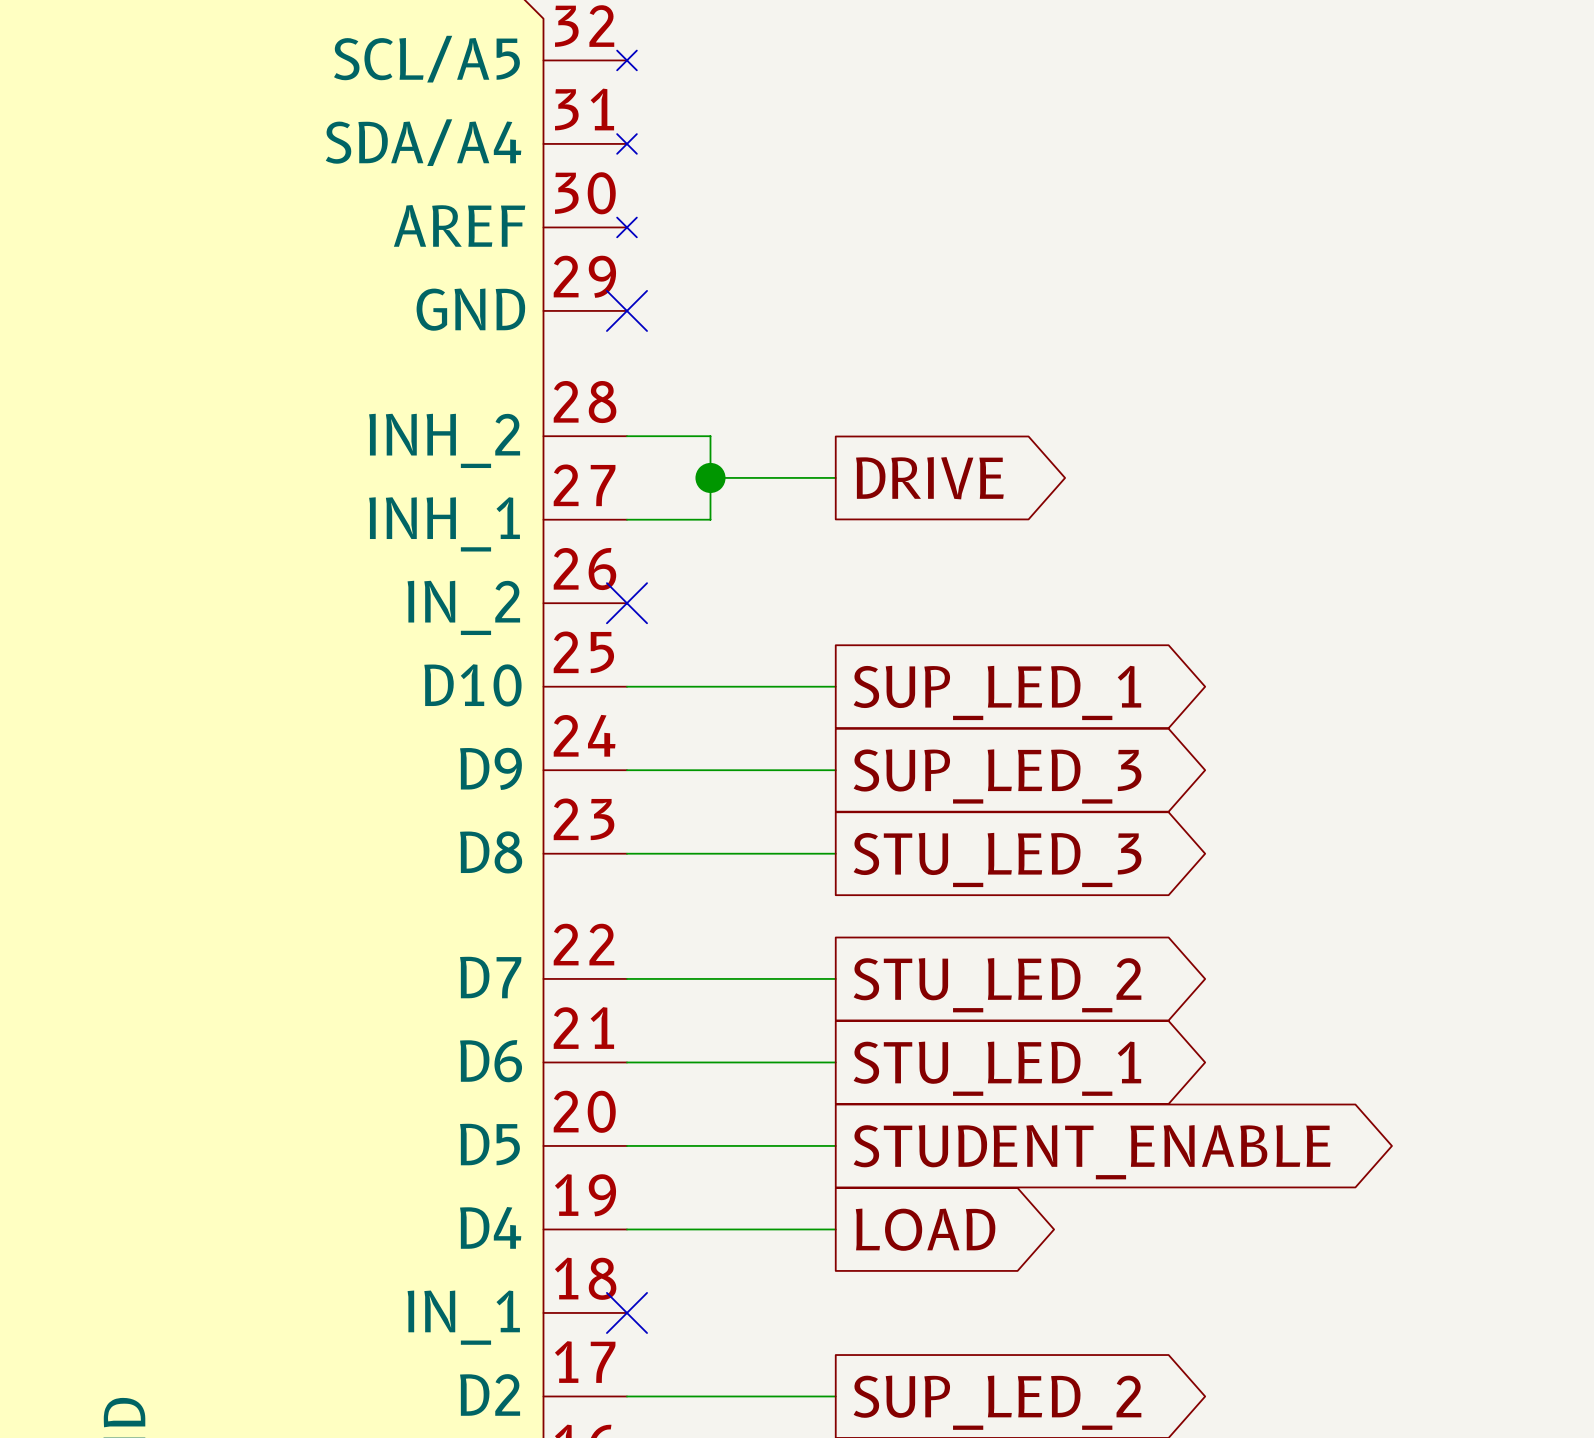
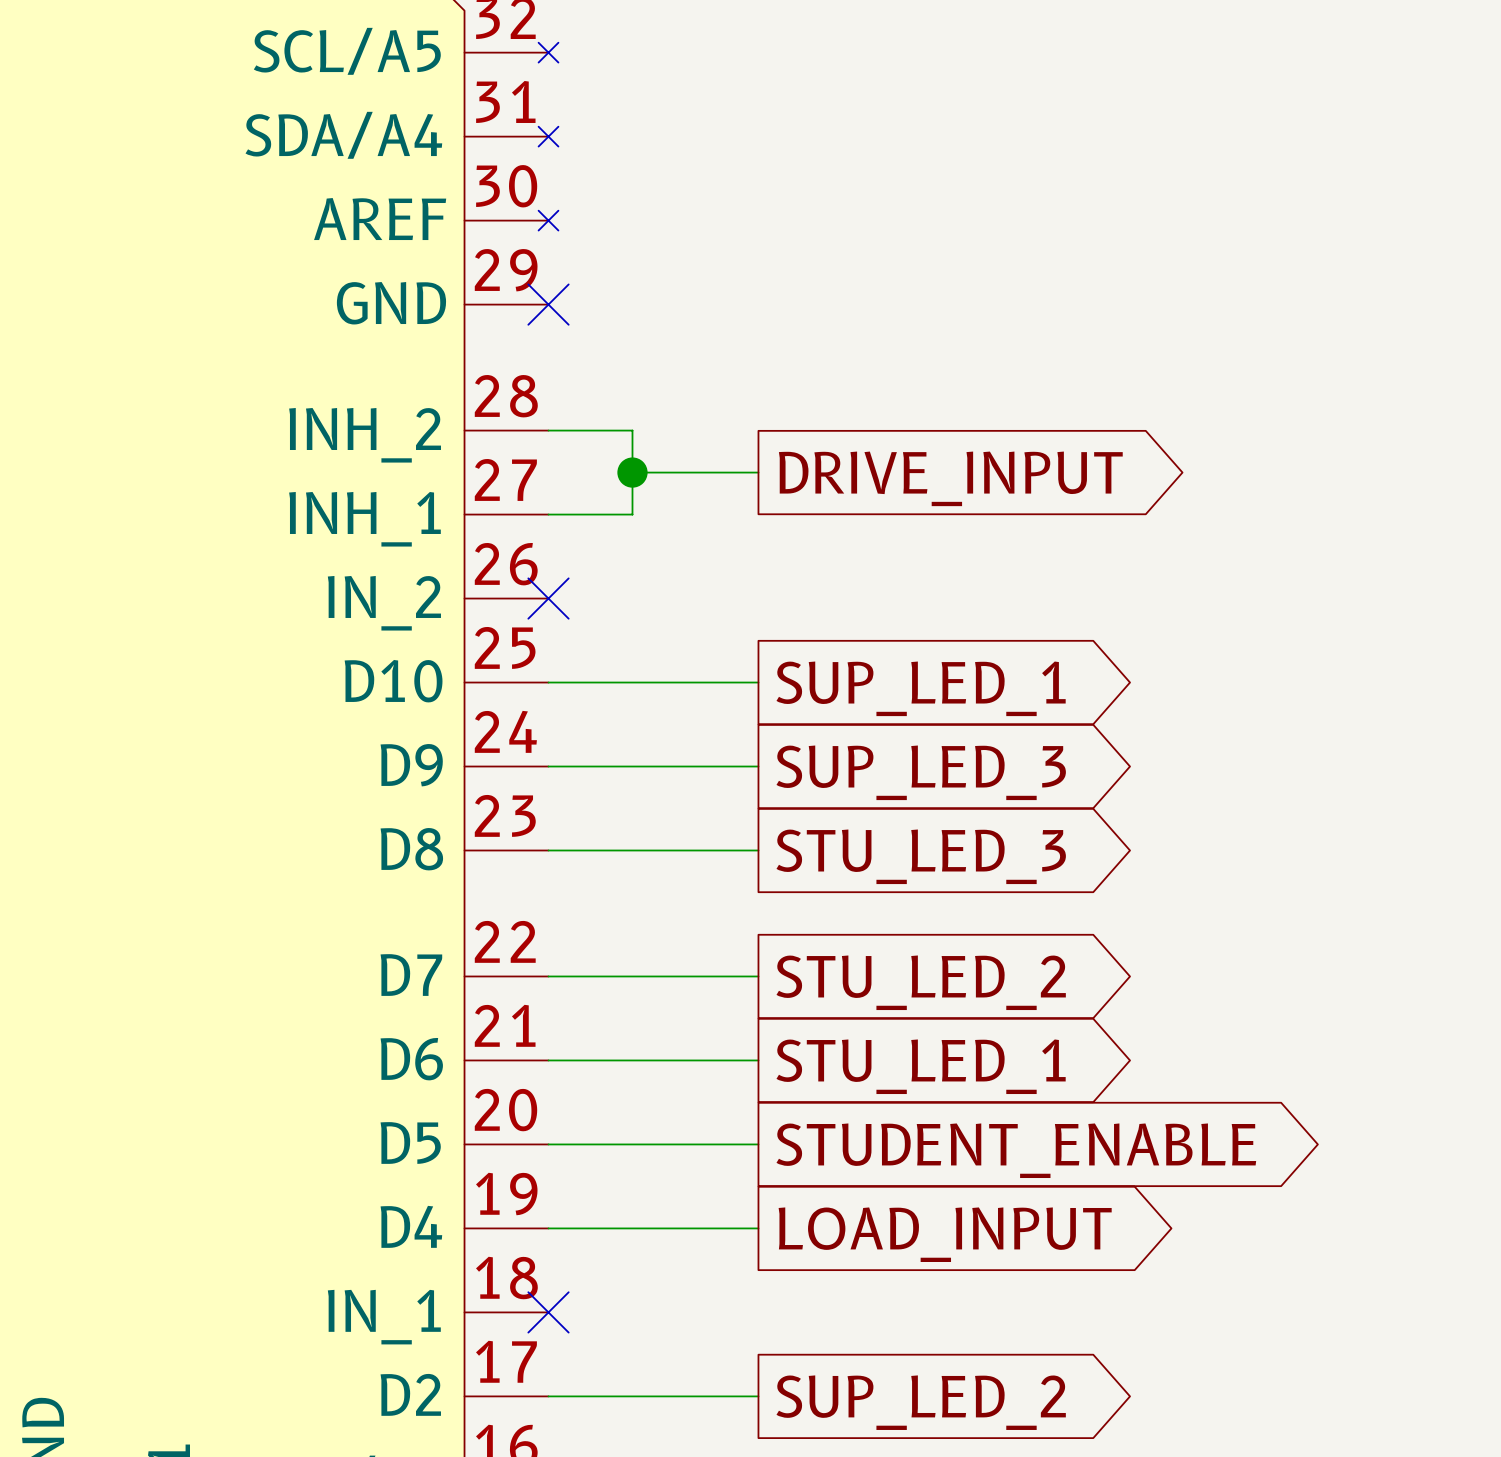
global label: DRIVE (929, 478) -> DRIVE_INPUT (950, 478)
global label: LOAD (925, 1229) -> LOAD_INPUT (945, 1234)

